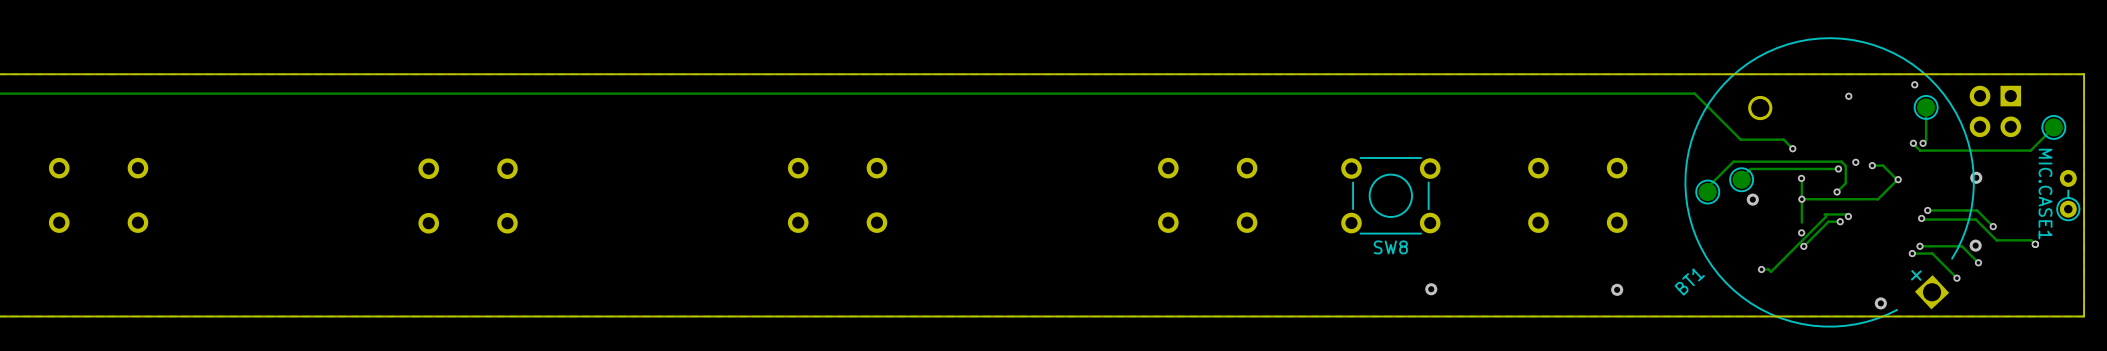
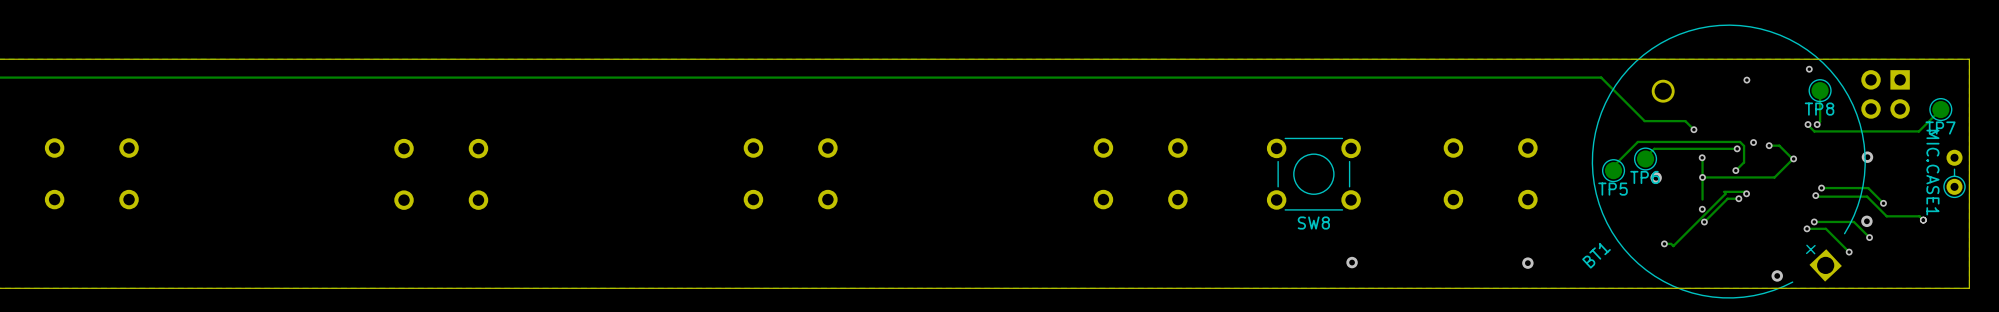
TP8 name: none -> TP8 (1819, 109)
TP7 name: none -> TP7 (1940, 128)
TP6 name: none -> TP6 (1645, 177)
TP5 name: none -> TP5 (1613, 189)

